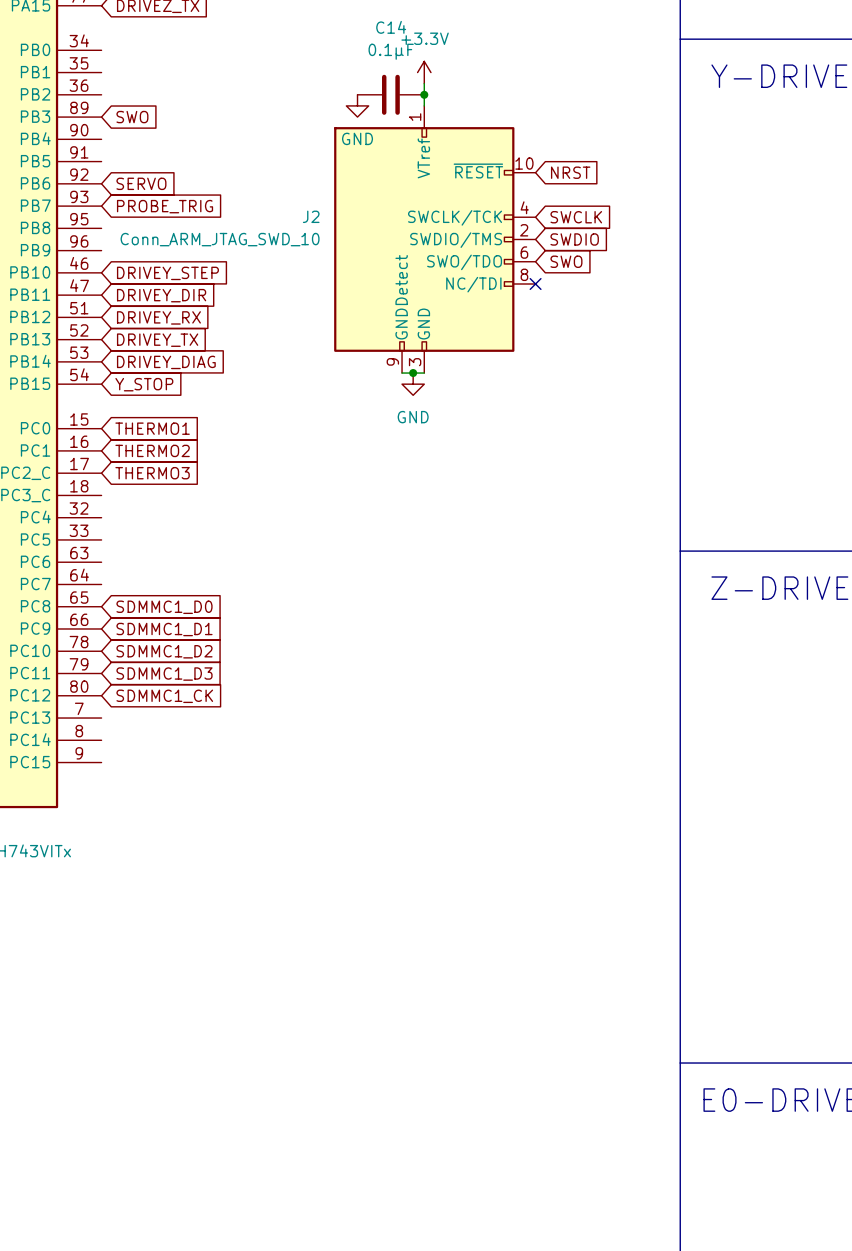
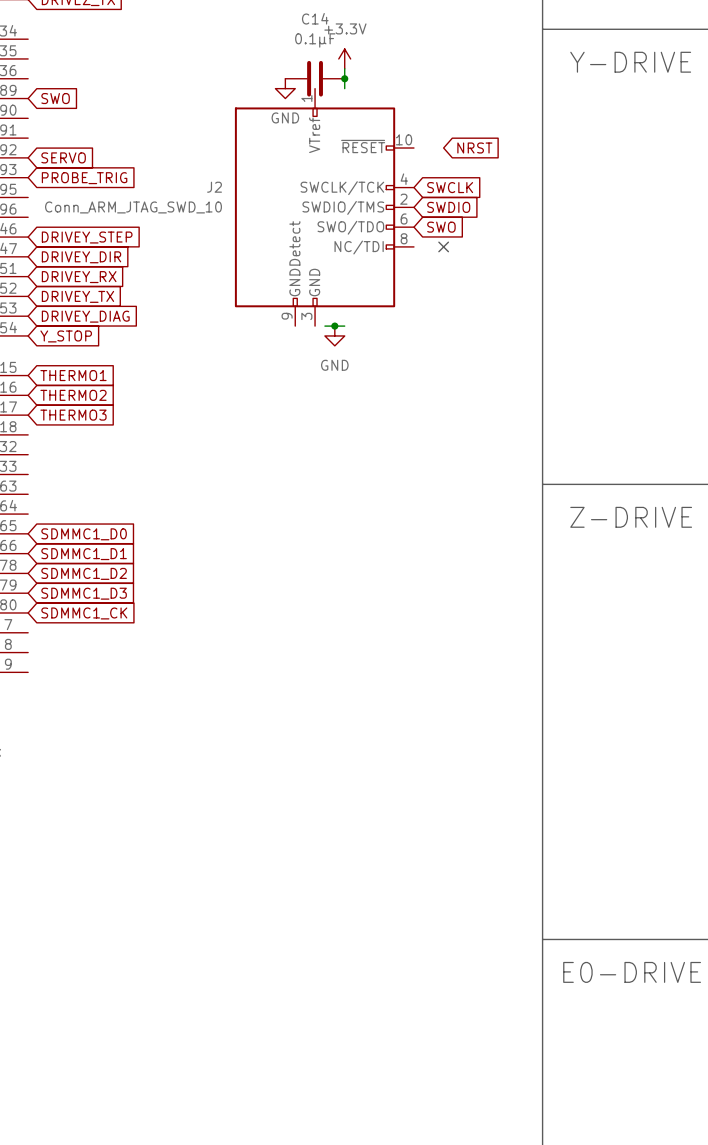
power symbol position: +3.3V (424, 72) -> +3.3V (344, 58)
wire: (424, 83) (424, 105) -> (344, 68) (344, 88)
C14 position: (390, 94) -> (315, 78)
junction position: (424, 94) -> (344, 78)
power symbol position: GND (357, 105) -> GND (285, 88)
global label position: NRST (570, 172) -> NRST (474, 148)
no-connect mark position: (535, 284) -> (443, 246)
wire: (402, 373) (424, 373) -> (324, 326) (344, 326)
junction position: (413, 373) -> (334, 326)
power symbol position: GND (413, 384) -> GND (334, 335)

